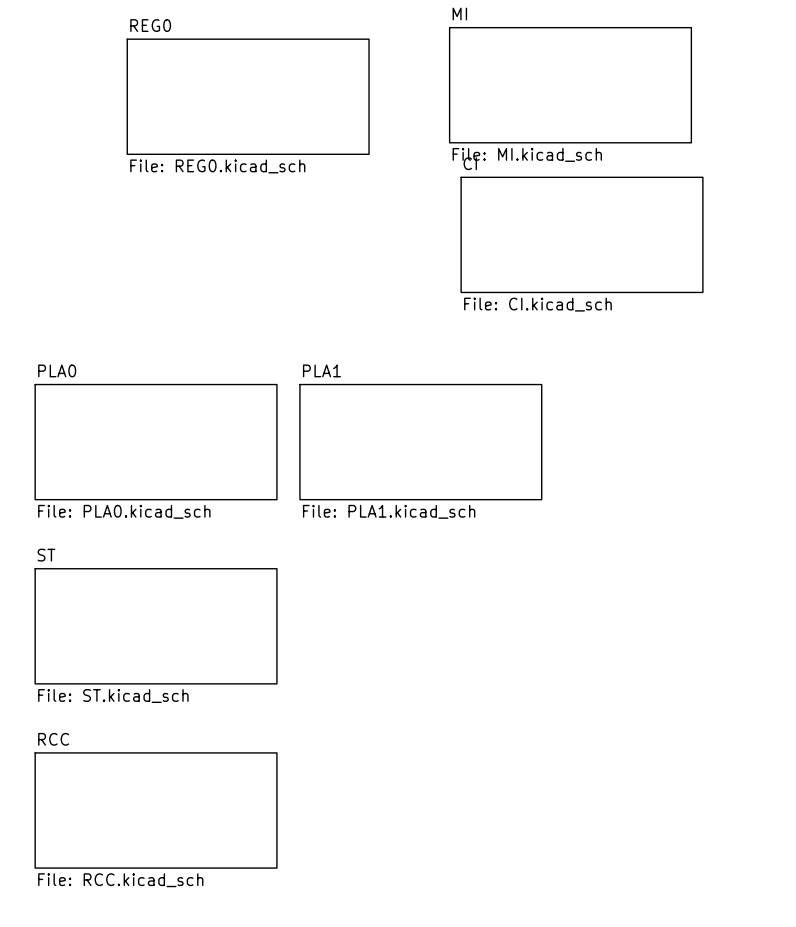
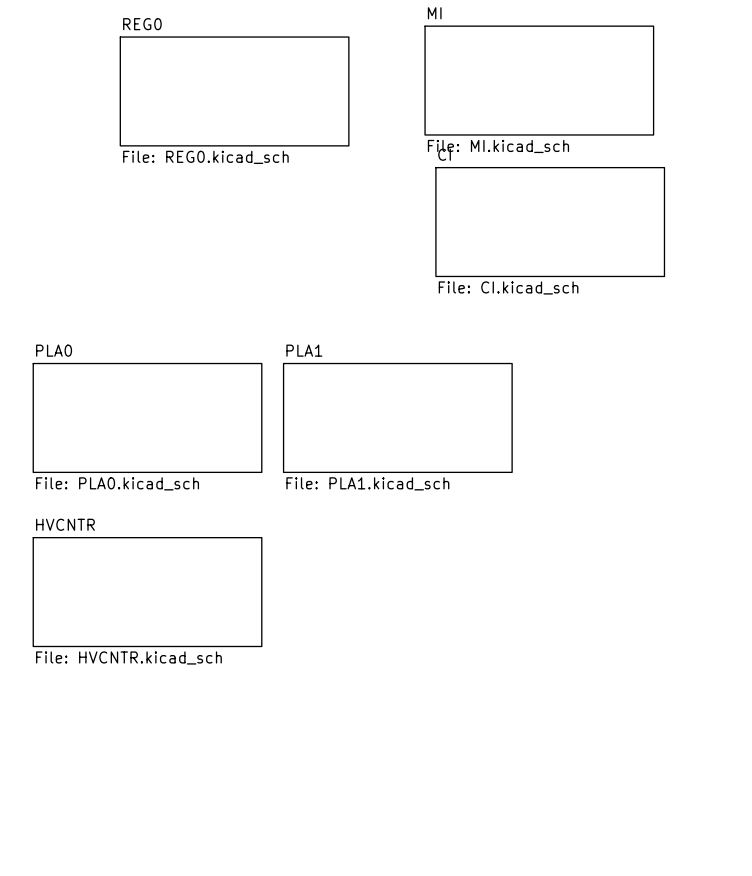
sheet ST name: ST (46, 555) -> HVCNTR (65, 524)
sheet ST value: File: ST.kicad_sch (113, 696) -> File: HVCNTR.kicad_sch (128, 657)
sheet RCC: File: RCC.kicad_sch (156, 810) -> none

